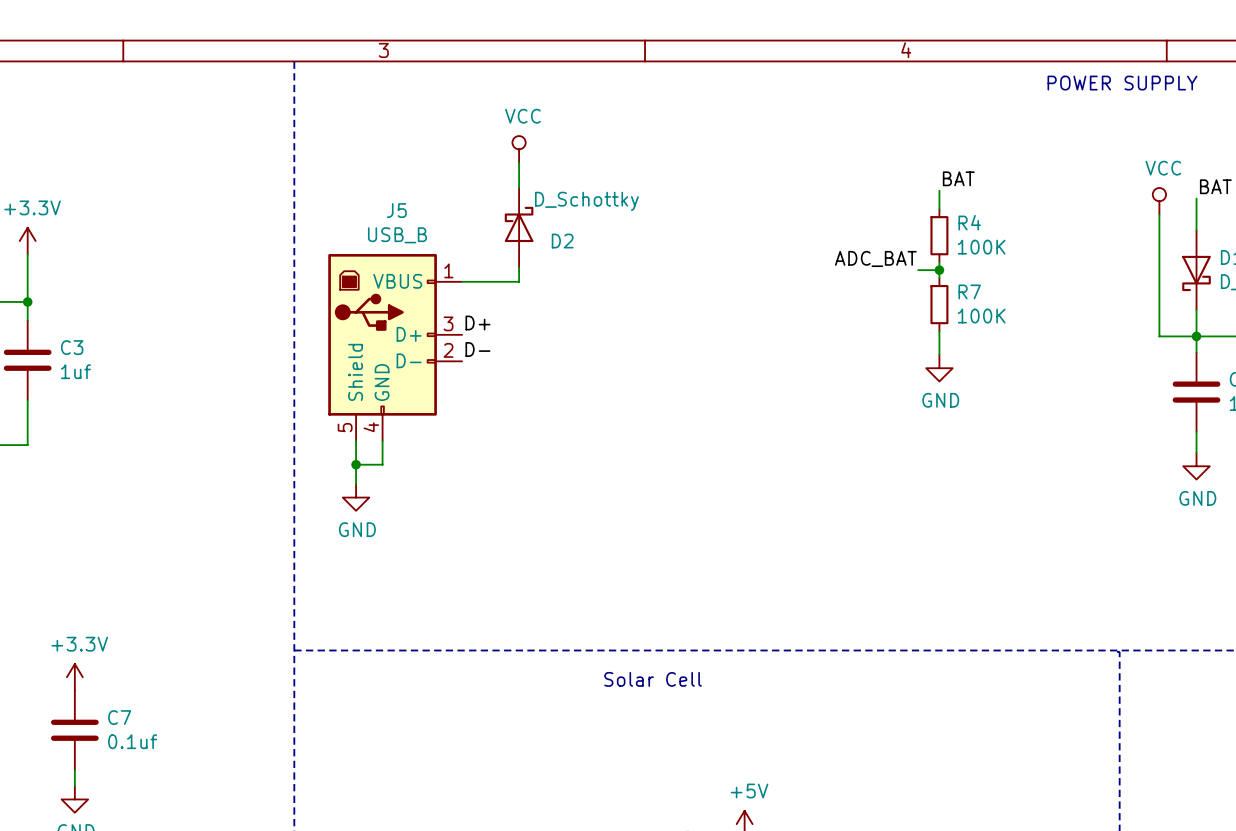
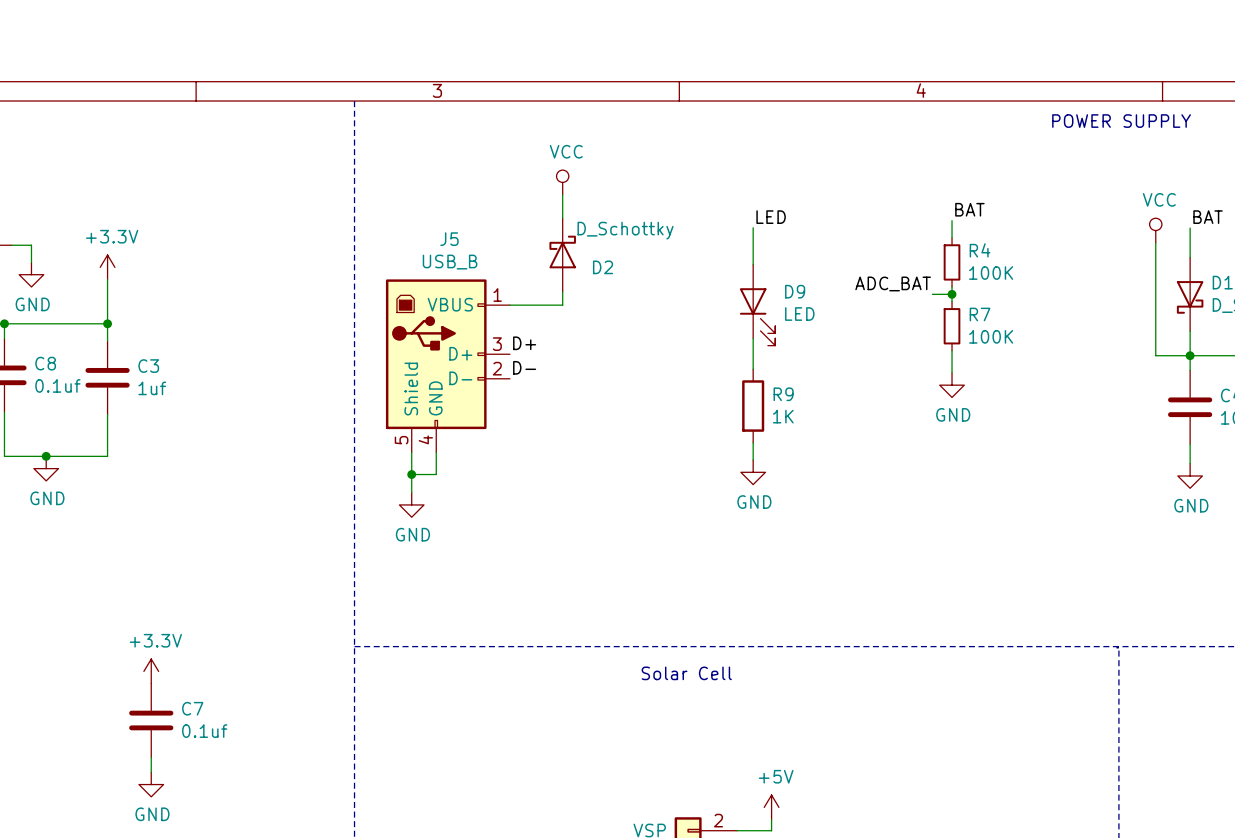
label: none -> LED (771, 217)
wire: none -> (753, 227) (753, 264)
D9: none -> LED (757, 305)
wire: none -> (753, 338) (753, 369)
R9: none -> 1K (753, 406)
wire: none -> (753, 442) (753, 460)
power symbol: none -> GND (753, 472)

